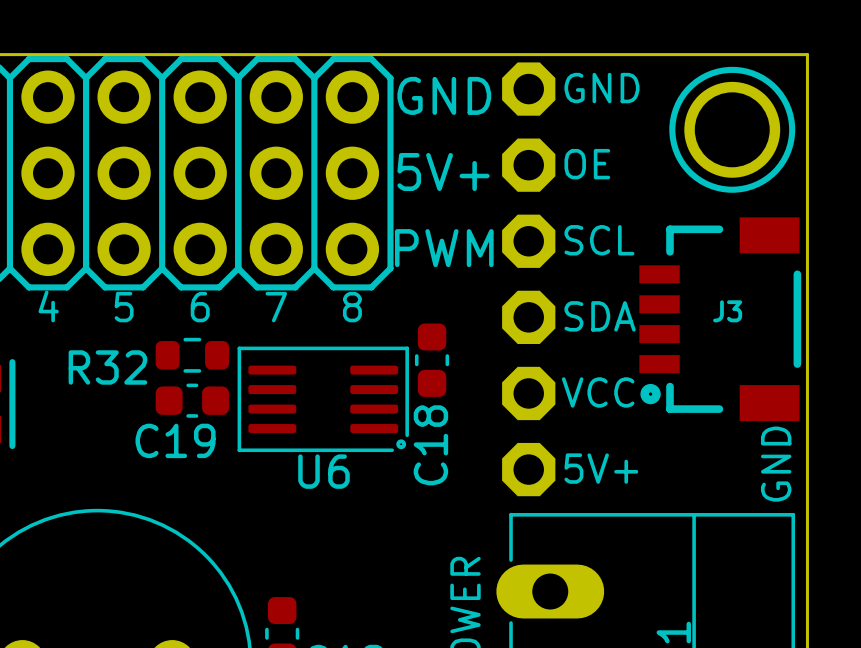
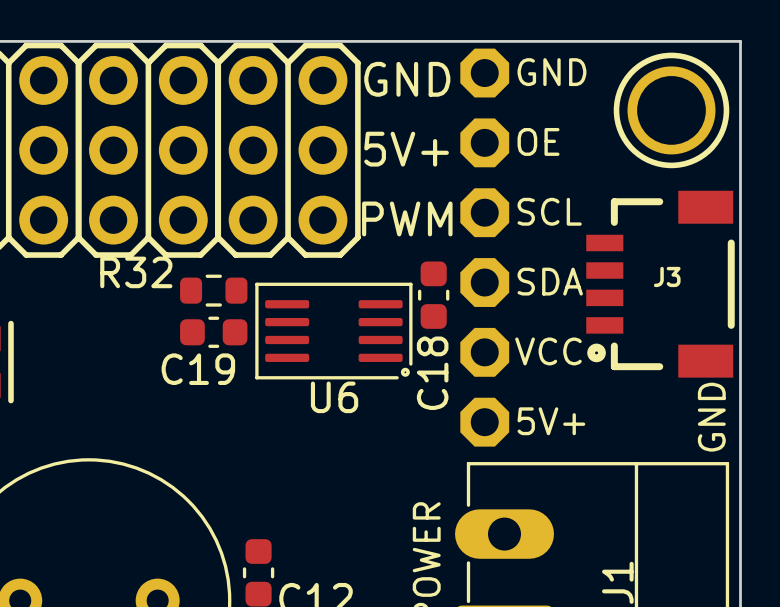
text: 4 (48, 306) -> none
text: 5 (124, 307) -> none
text: 6 (200, 307) -> none
text: 7 (276, 307) -> none
text: 8 (352, 307) -> none
R32 position: (192, 355) -> (213, 290)
C18 position: (432, 360) -> (433, 295)
R32 name position: R32 (107, 367) -> R32 (136, 272)
U6 position: (323, 399) -> (333, 331)
C19 position: (192, 400) -> (213, 332)

